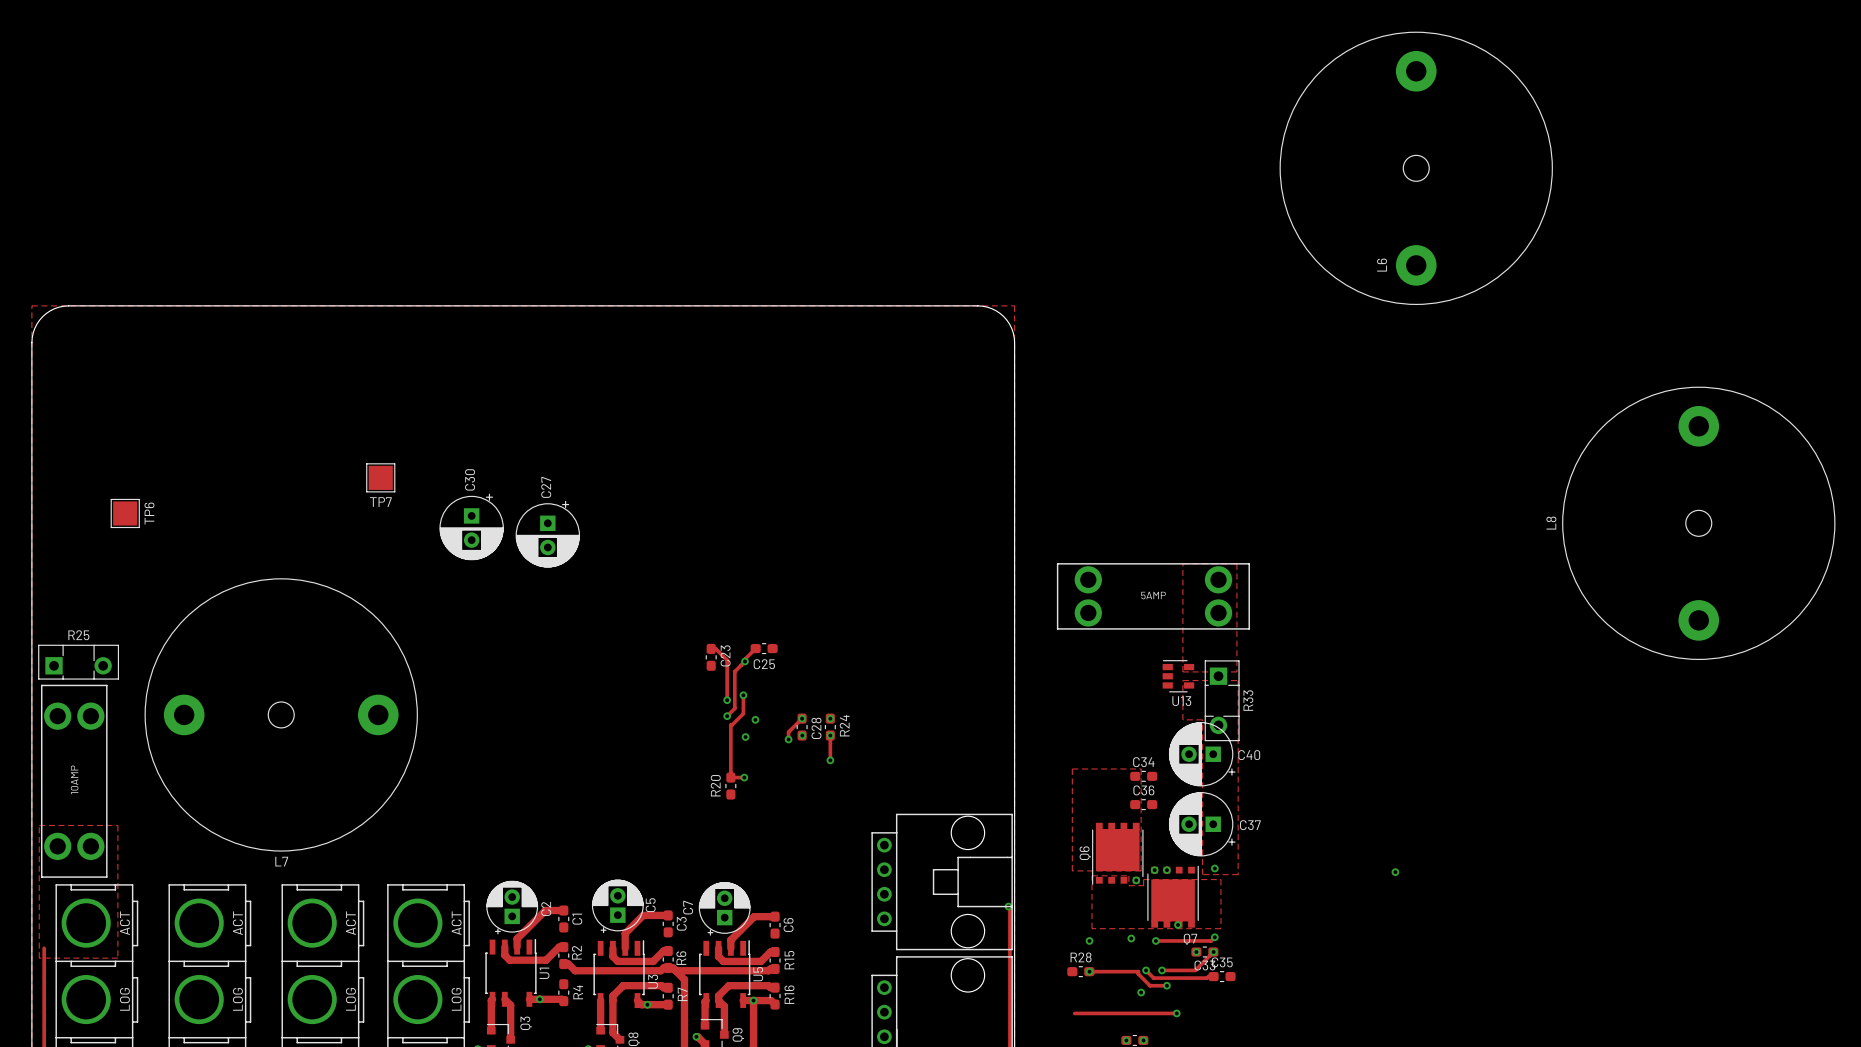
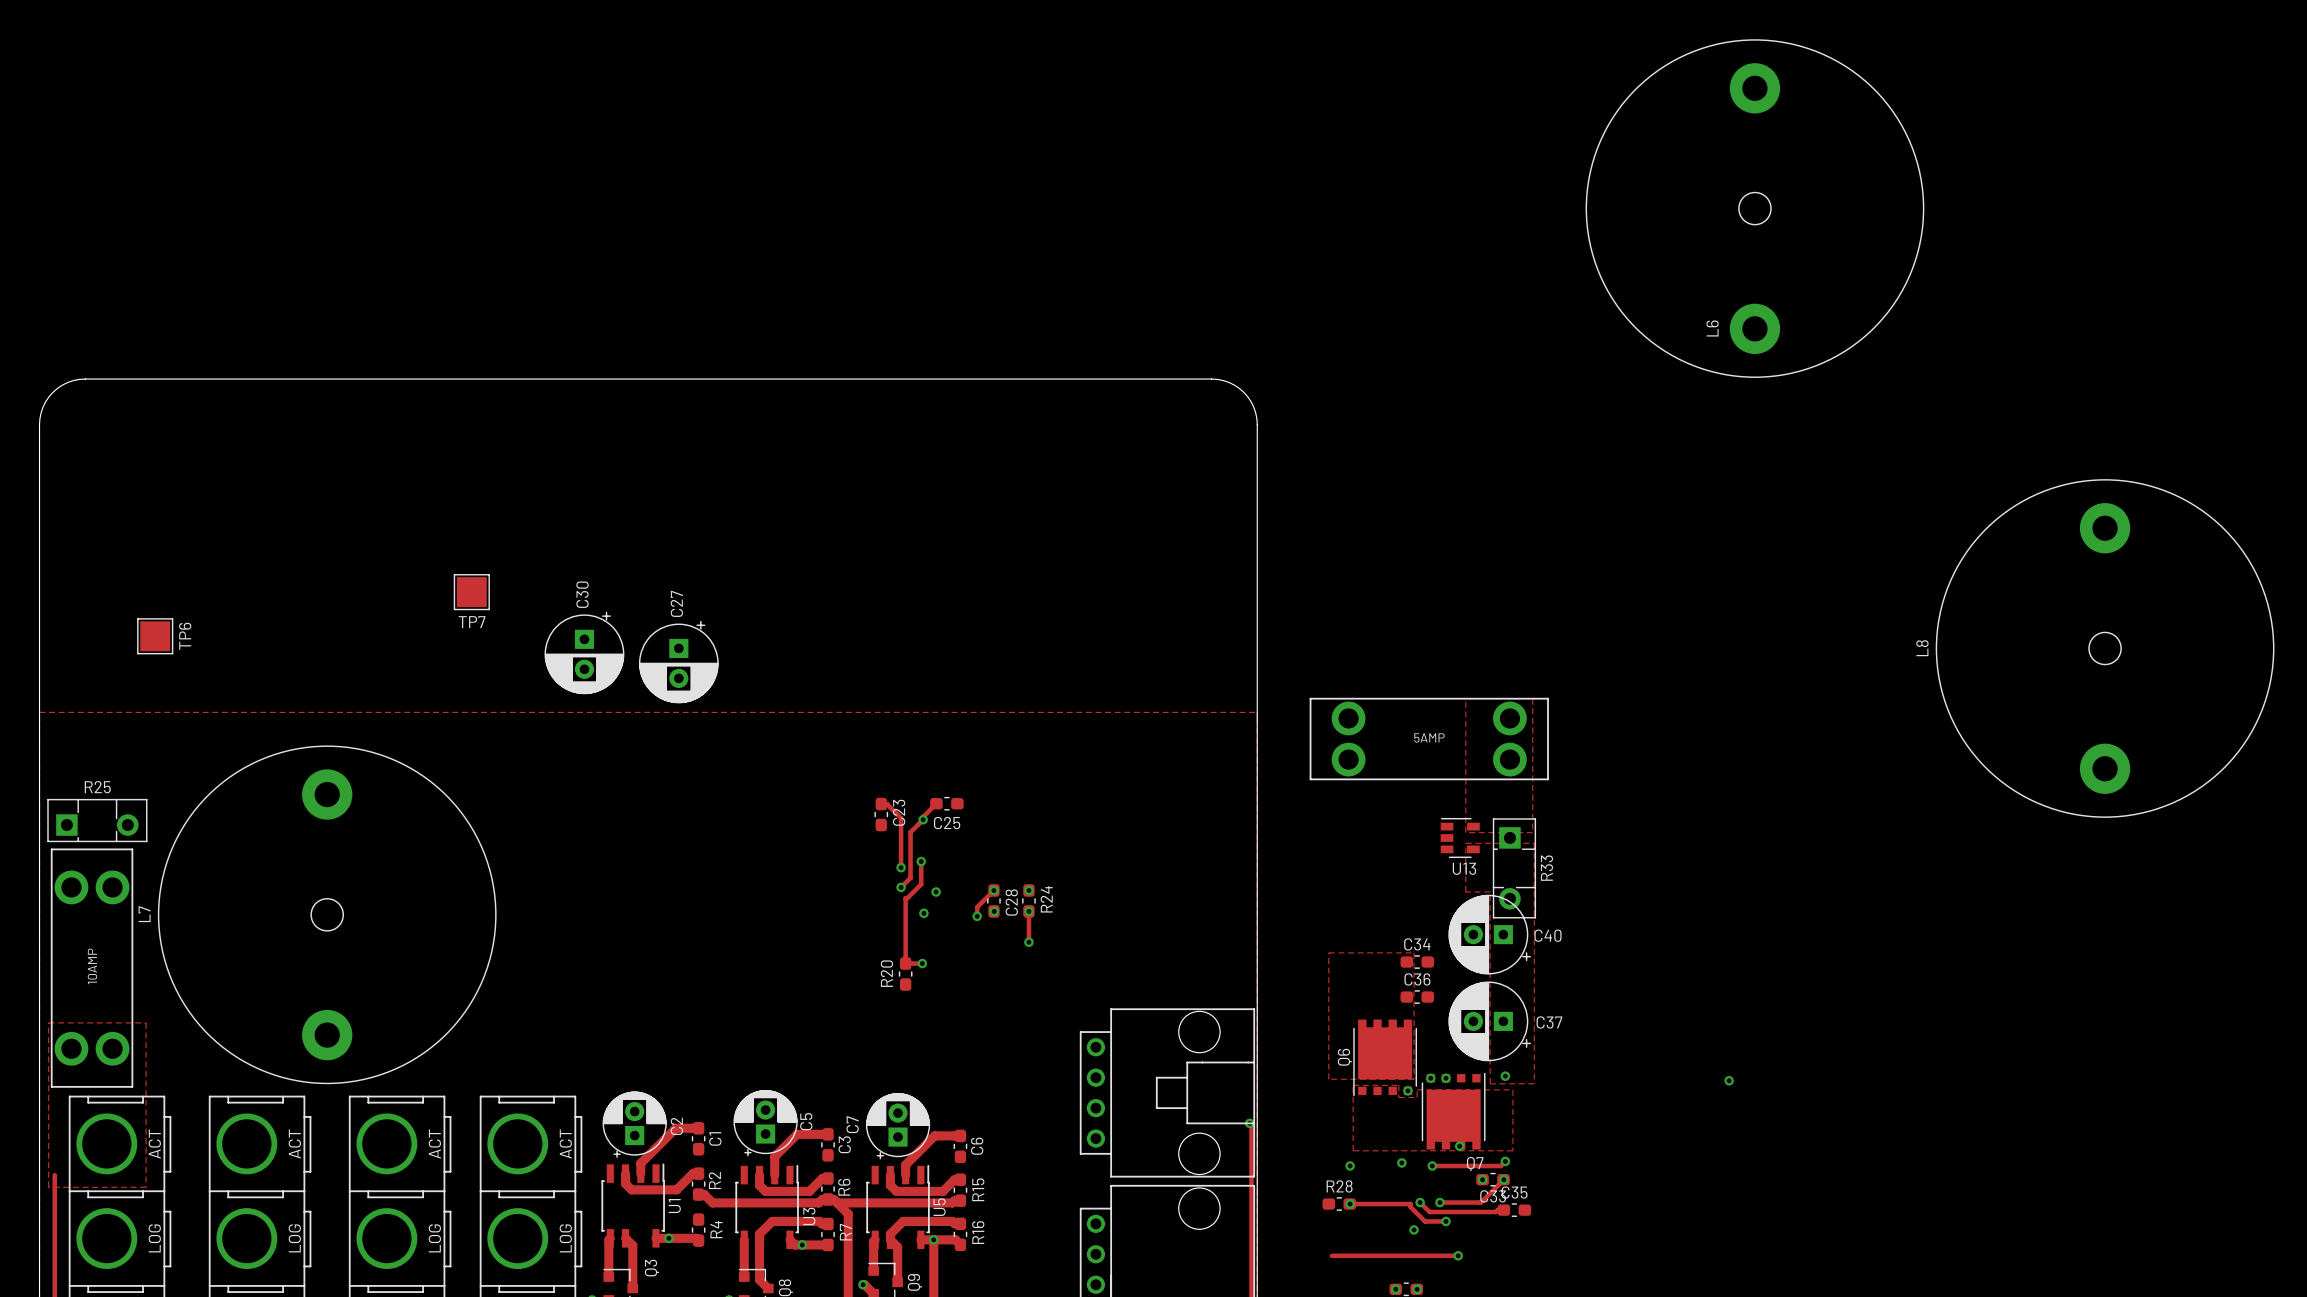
zone outline: (31, 574) (31, 305) (1014, 305) (1014, 574) -> (39, 712) (1257, 712)
L7 rotation: 0° (281, 714) -> 90° clockwise (327, 914)

